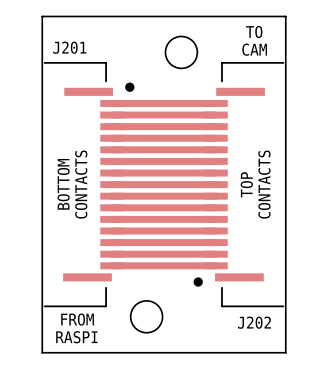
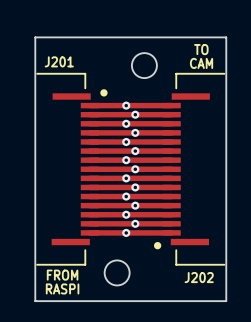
via: none -> (126, 105)
via: none -> (135, 114)
via: none -> (126, 123)
via: none -> (135, 132)
via: none -> (126, 141)
via: none -> (135, 151)
via: none -> (126, 160)
text: BOTTOM (63, 184) -> none
text: CONTACTS (81, 184) -> none
via: none -> (135, 169)
text: TOP (246, 184) -> none
text: CONTACTS (264, 184) -> none
via: none -> (126, 178)
via: none -> (135, 187)
via: none -> (126, 196)
via: none -> (135, 205)
via: none -> (126, 214)
via: none -> (135, 223)
via: none -> (126, 232)

